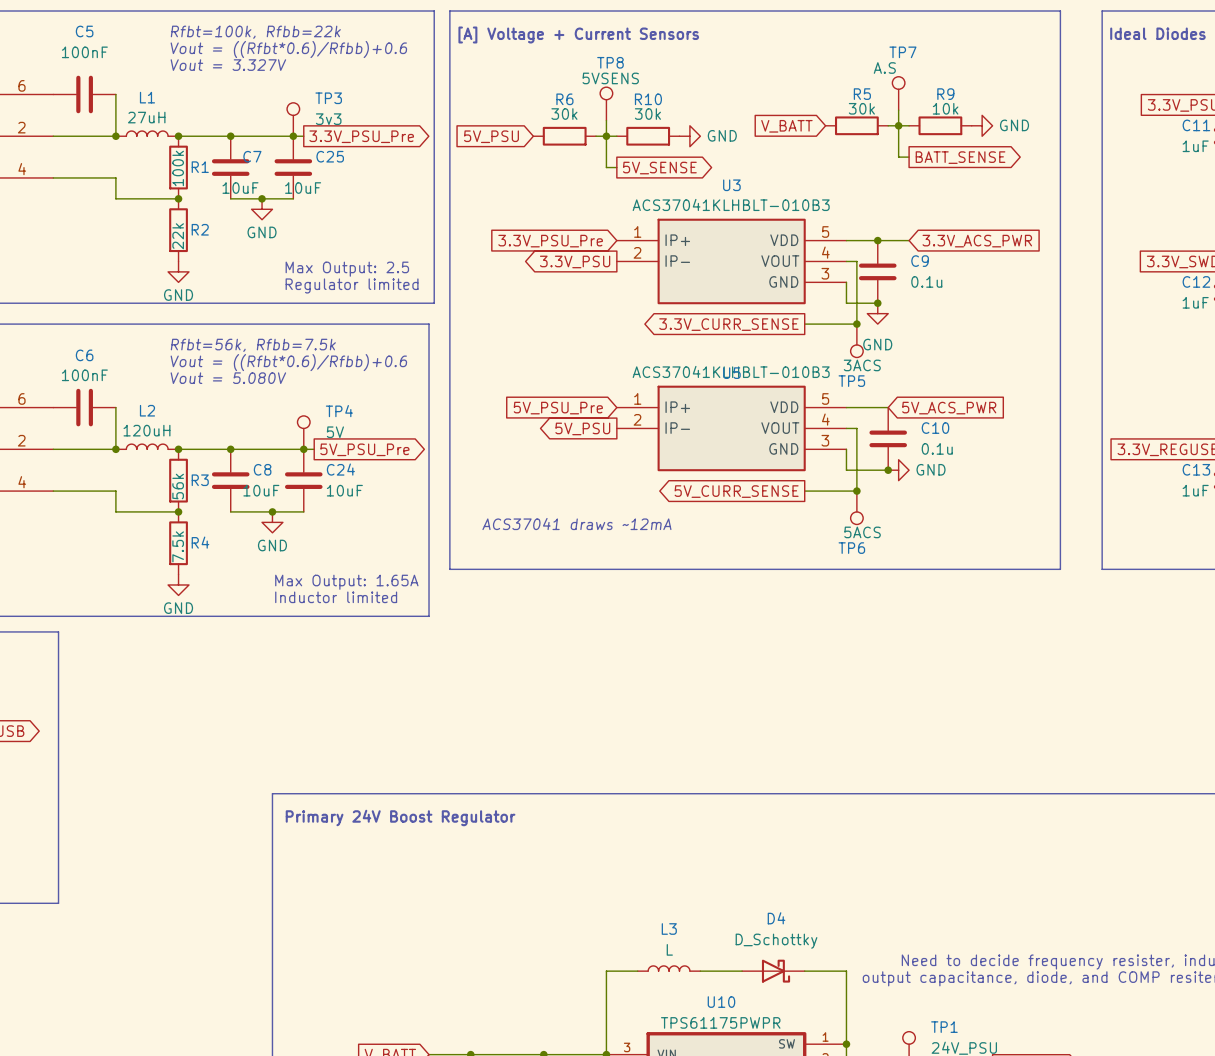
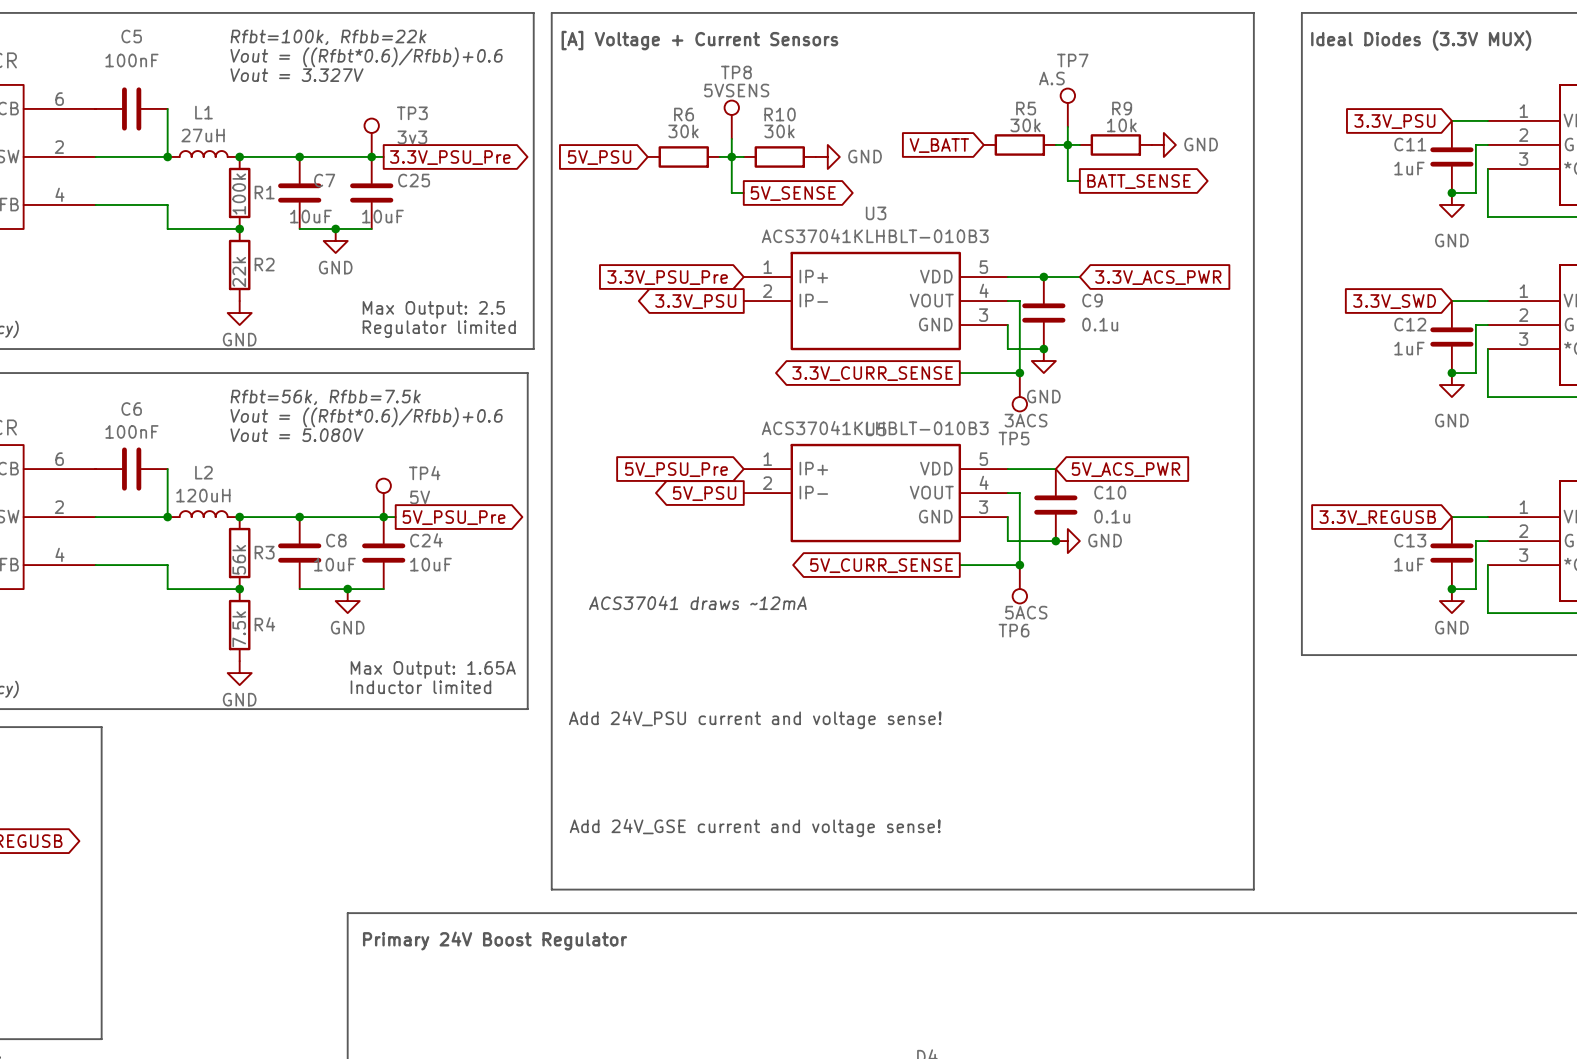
line: (449, 569) (1060, 569) -> (551, 655) (551, 889) (1253, 889) (1253, 655)
text: none -> Add 24V_PSU current and voltage sense! (755, 719)
text: none -> Add 24V_GSE current and voltage sense! (755, 828)

